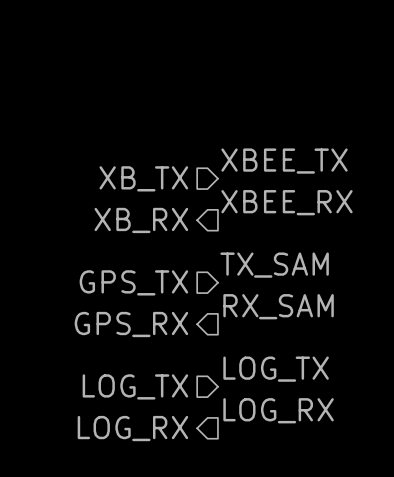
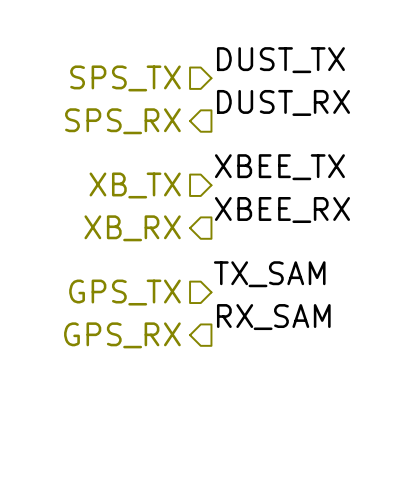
label: none -> DUST_TX (280, 60)
hierarchical label: none -> SPS_TX (125, 78)
label: none -> DUST_RX (283, 102)
hierarchical label: none -> SPS_RX (122, 121)
label: LOG_TX (276, 369) -> none
hierarchical label: LOG_TX (135, 386) -> none
label: LOG_RX (278, 410) -> none
hierarchical label: LOG_RX (132, 428) -> none

